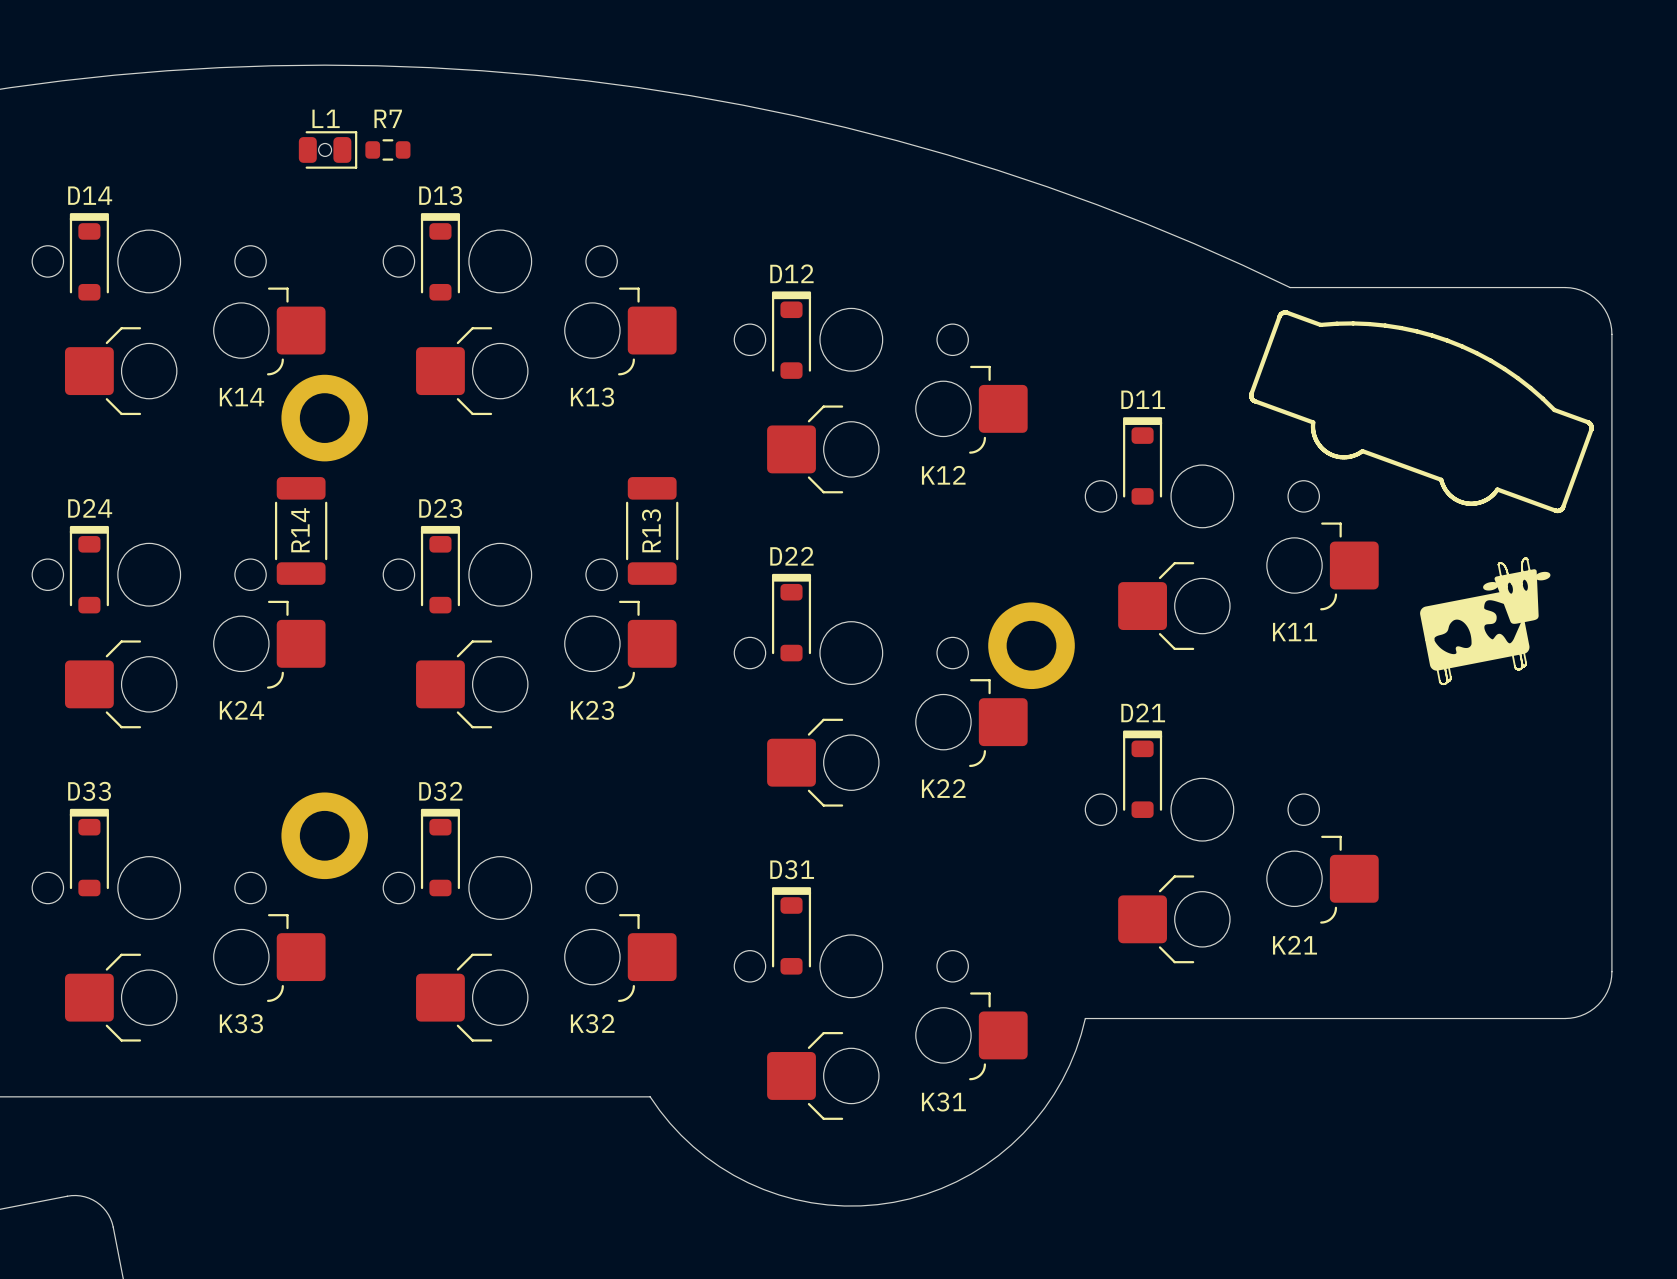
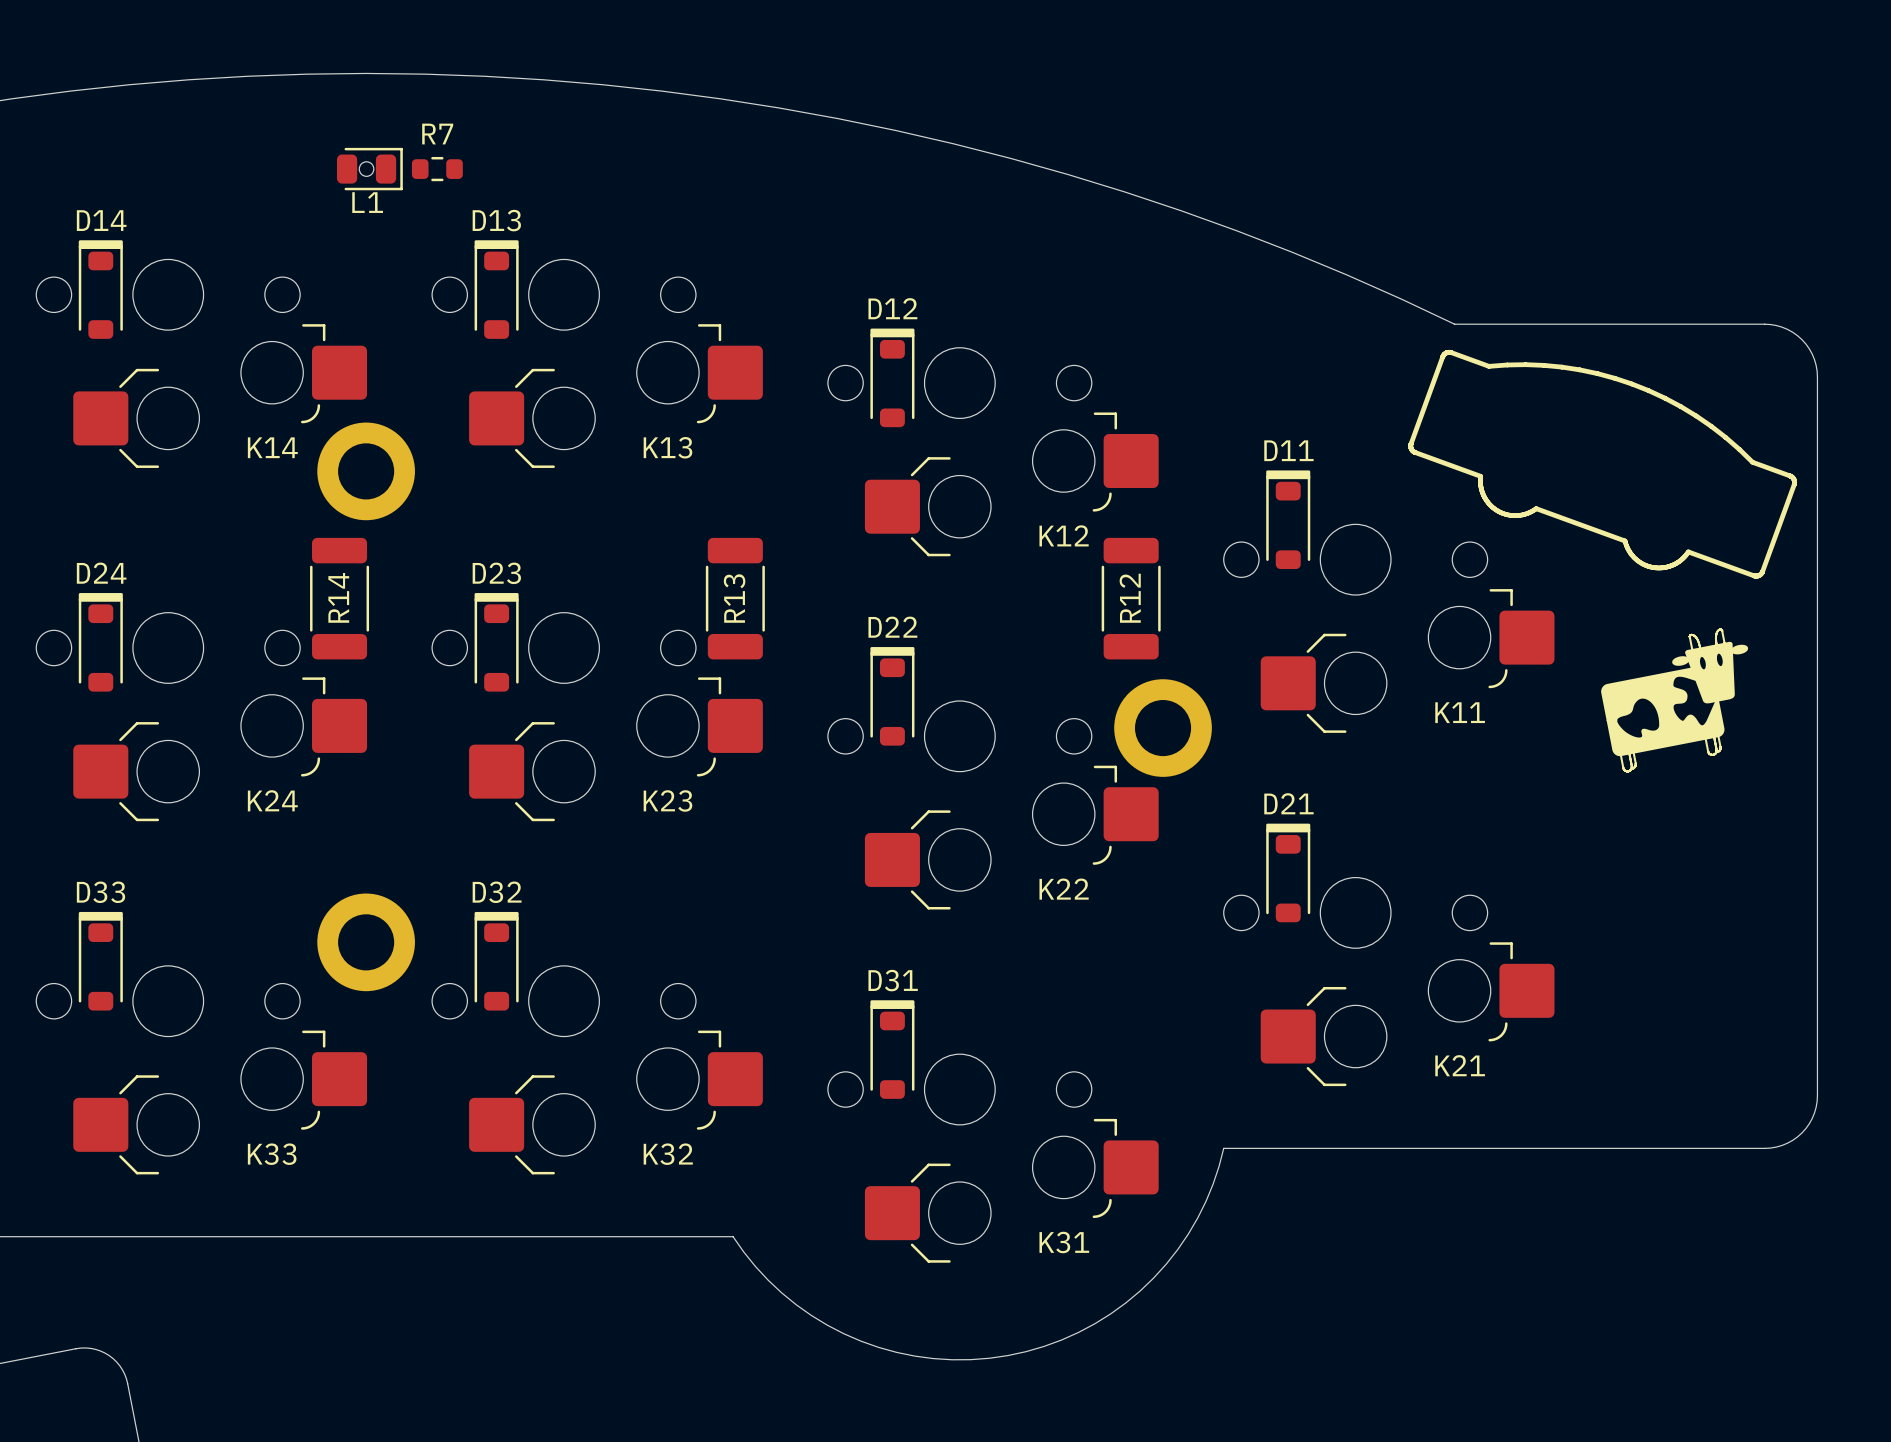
L1 name position: L1 (326, 118) -> L1 (367, 202)
R12: none -> (1131, 598)

